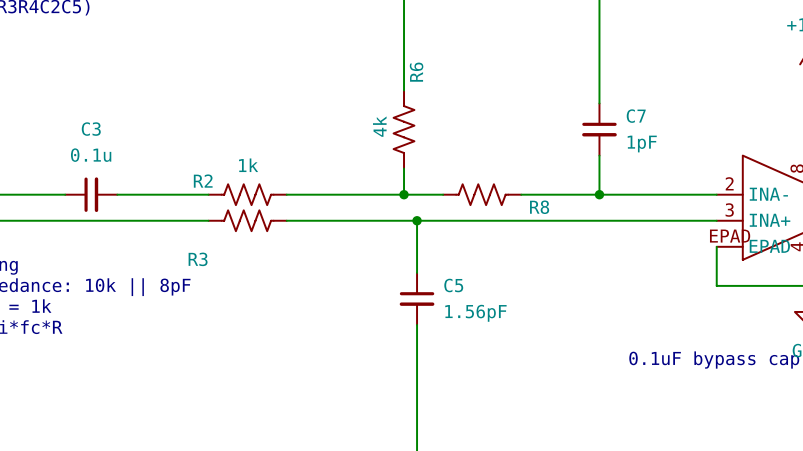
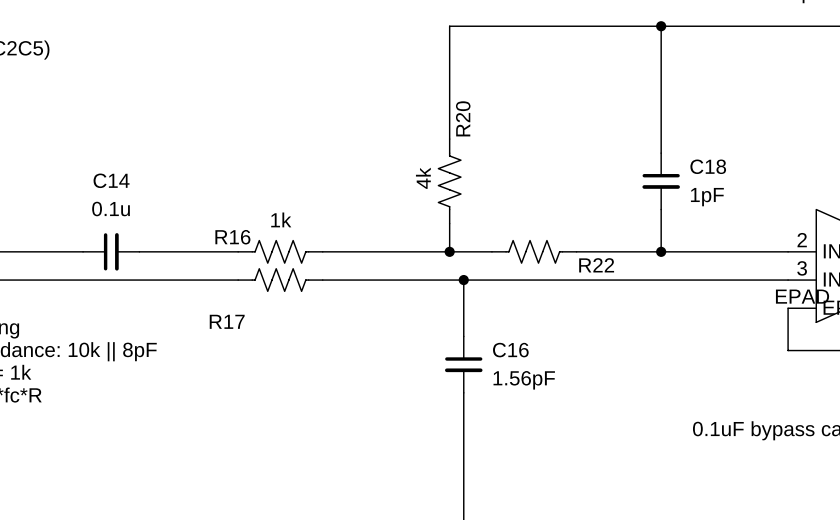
R6 name: R6 (416, 72) -> R20 (463, 118)
C7 name: C7 (636, 116) -> C18 (708, 166)
C3 name: C3 (91, 129) -> C14 (111, 180)
R2 name: R2 (203, 181) -> R16 (232, 237)
R8 name: R8 (539, 207) -> R22 (596, 265)
R3 name: R3 (198, 259) -> R17 (227, 321)
C5 name: C5 (453, 285) -> C16 (510, 350)

